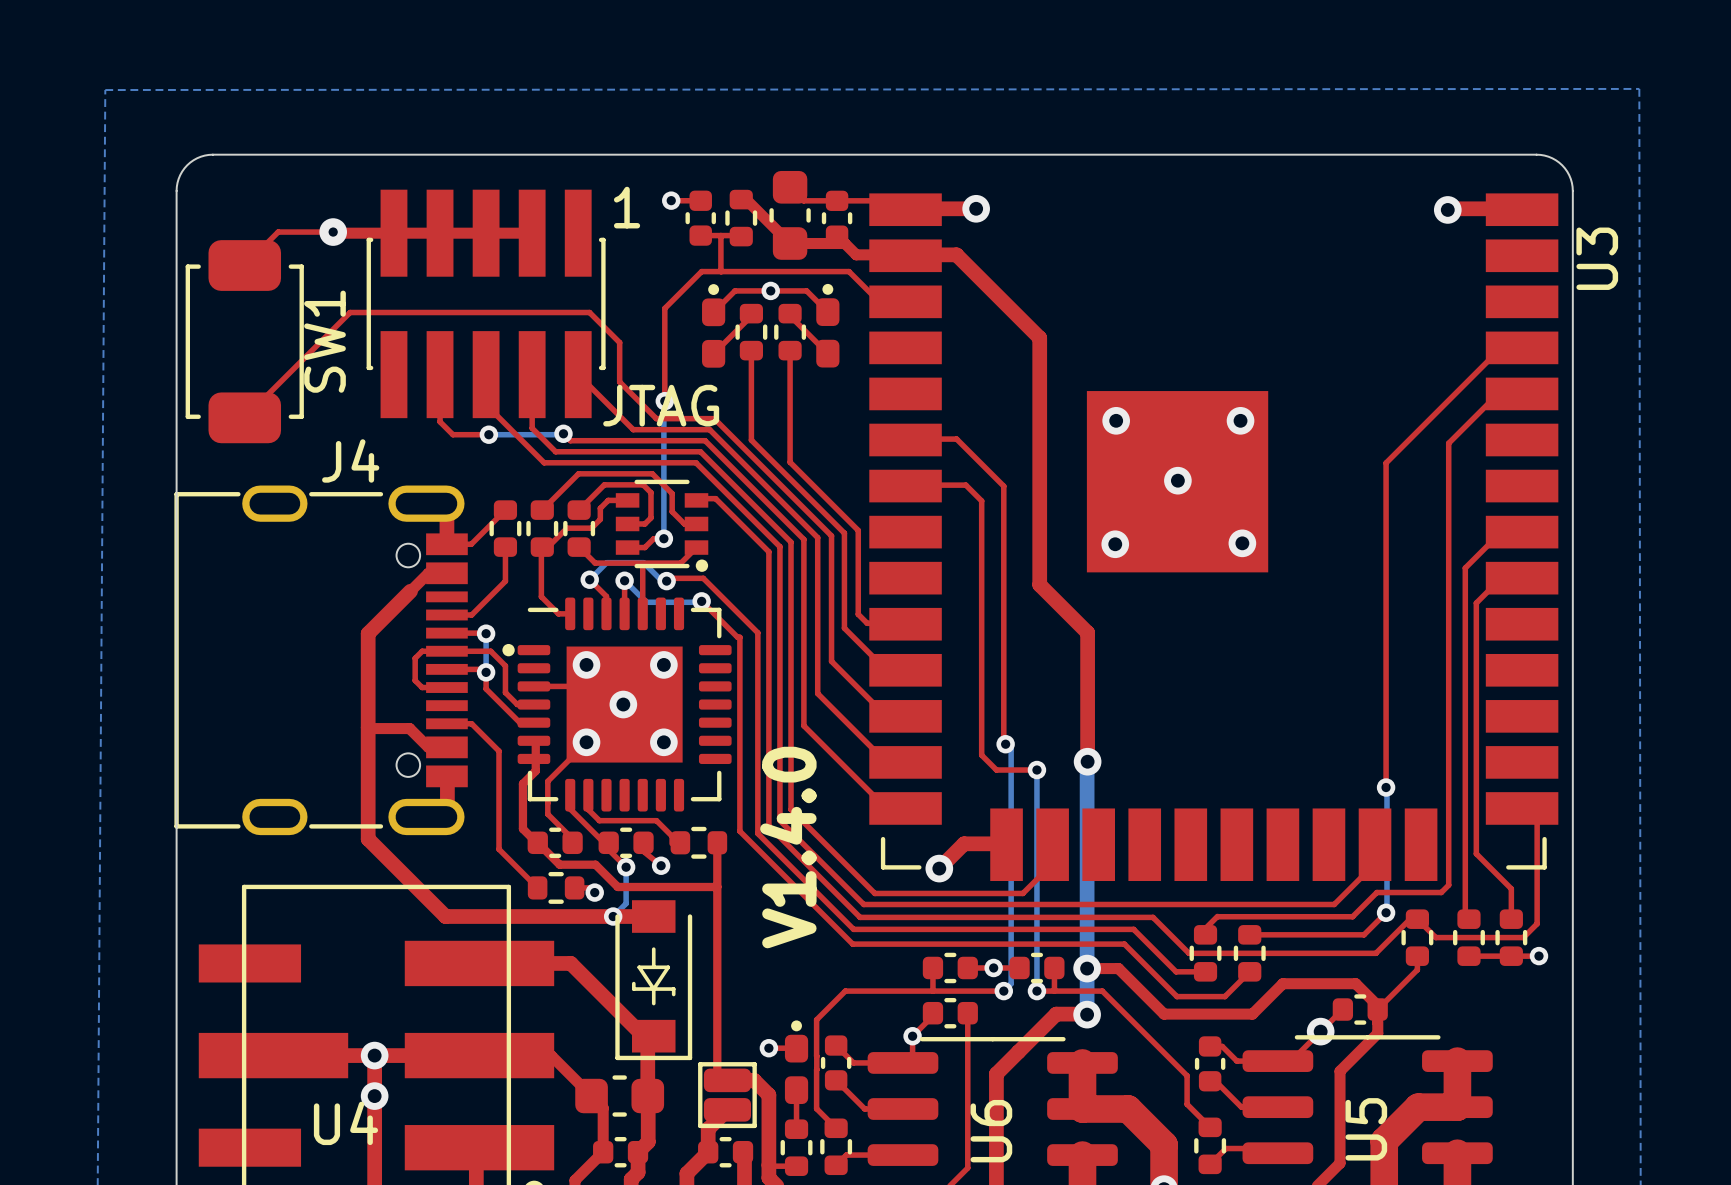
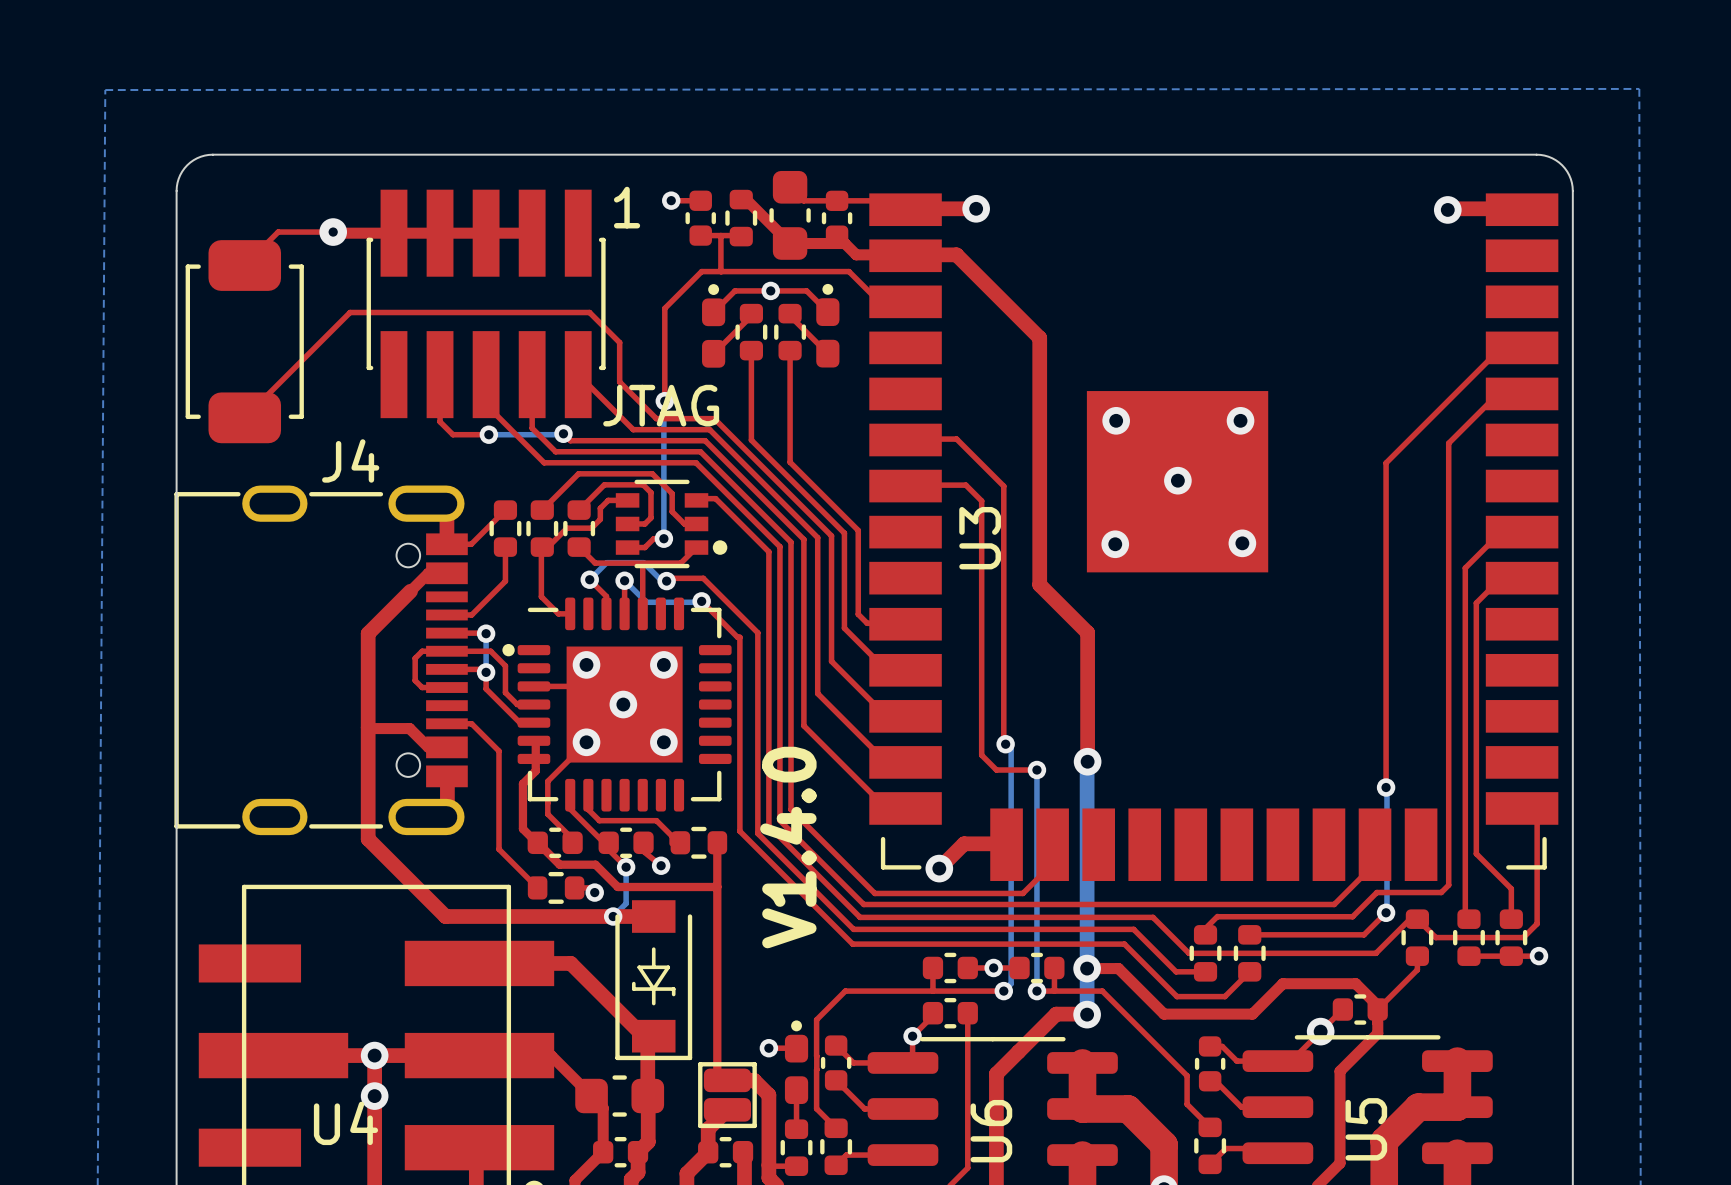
U3 name position: U3 (1597, 258) -> U3 (980, 538)
SW1 name: SW1 (325, 341) -> none
part footprint: [615, 479, 709, 572] -> [615, 479, 728, 569]

